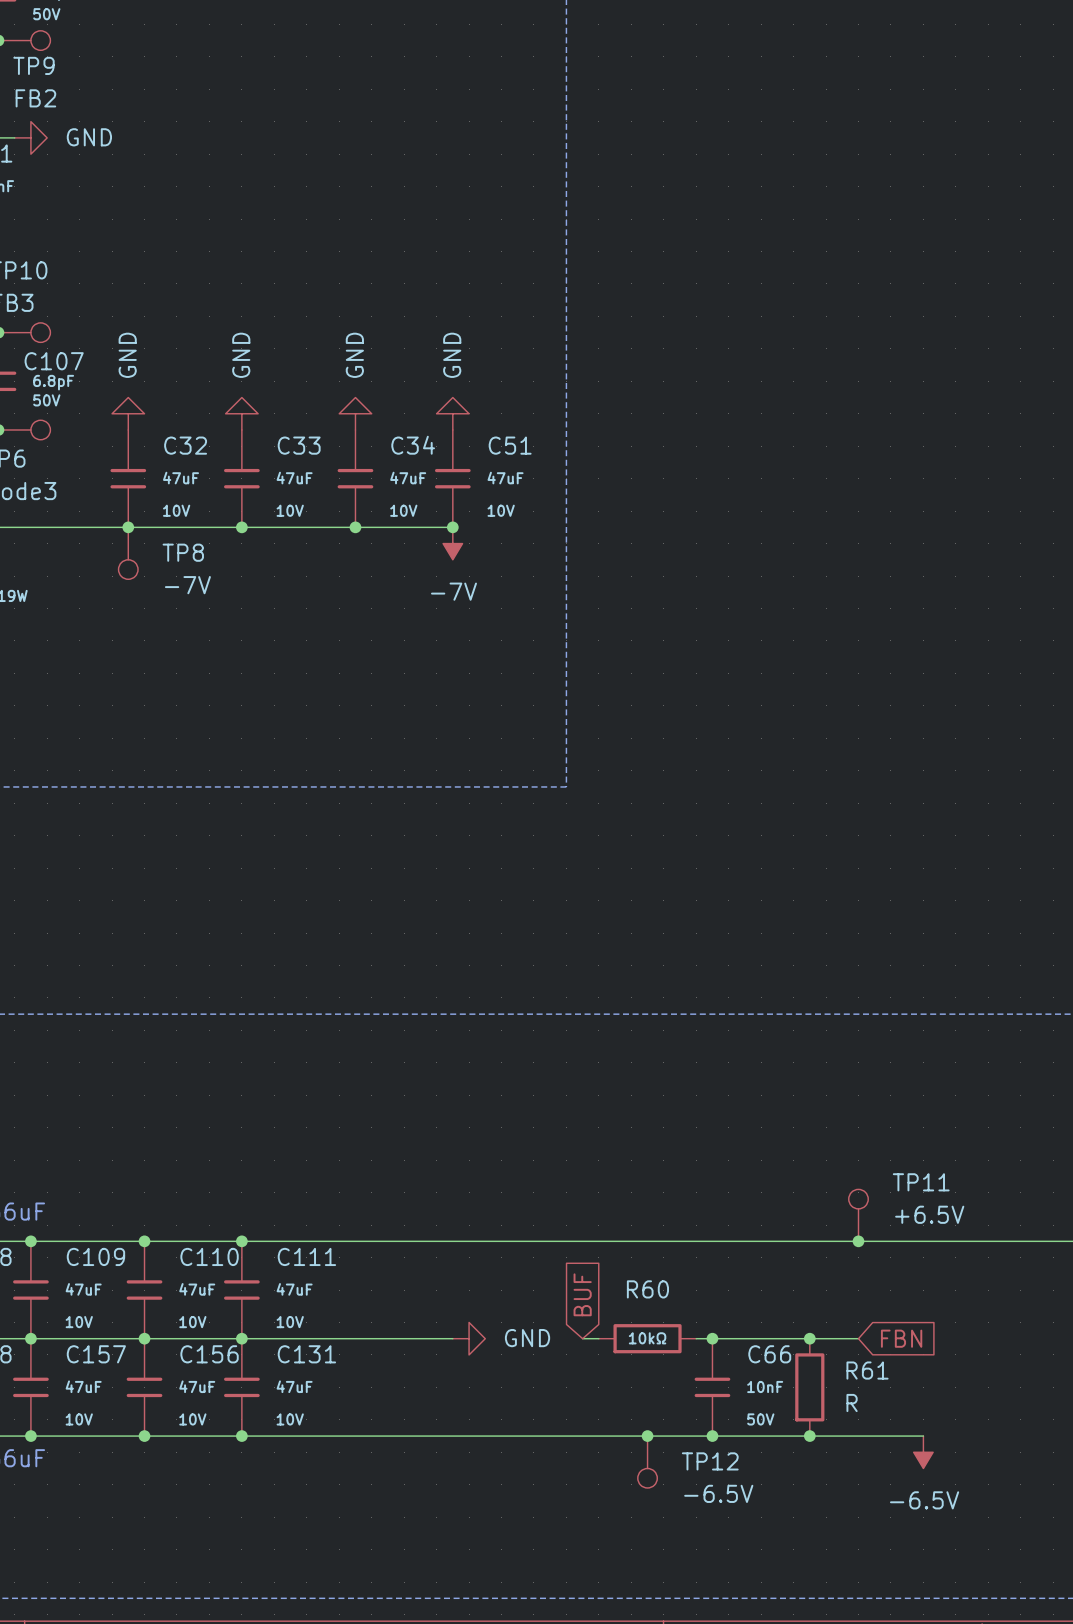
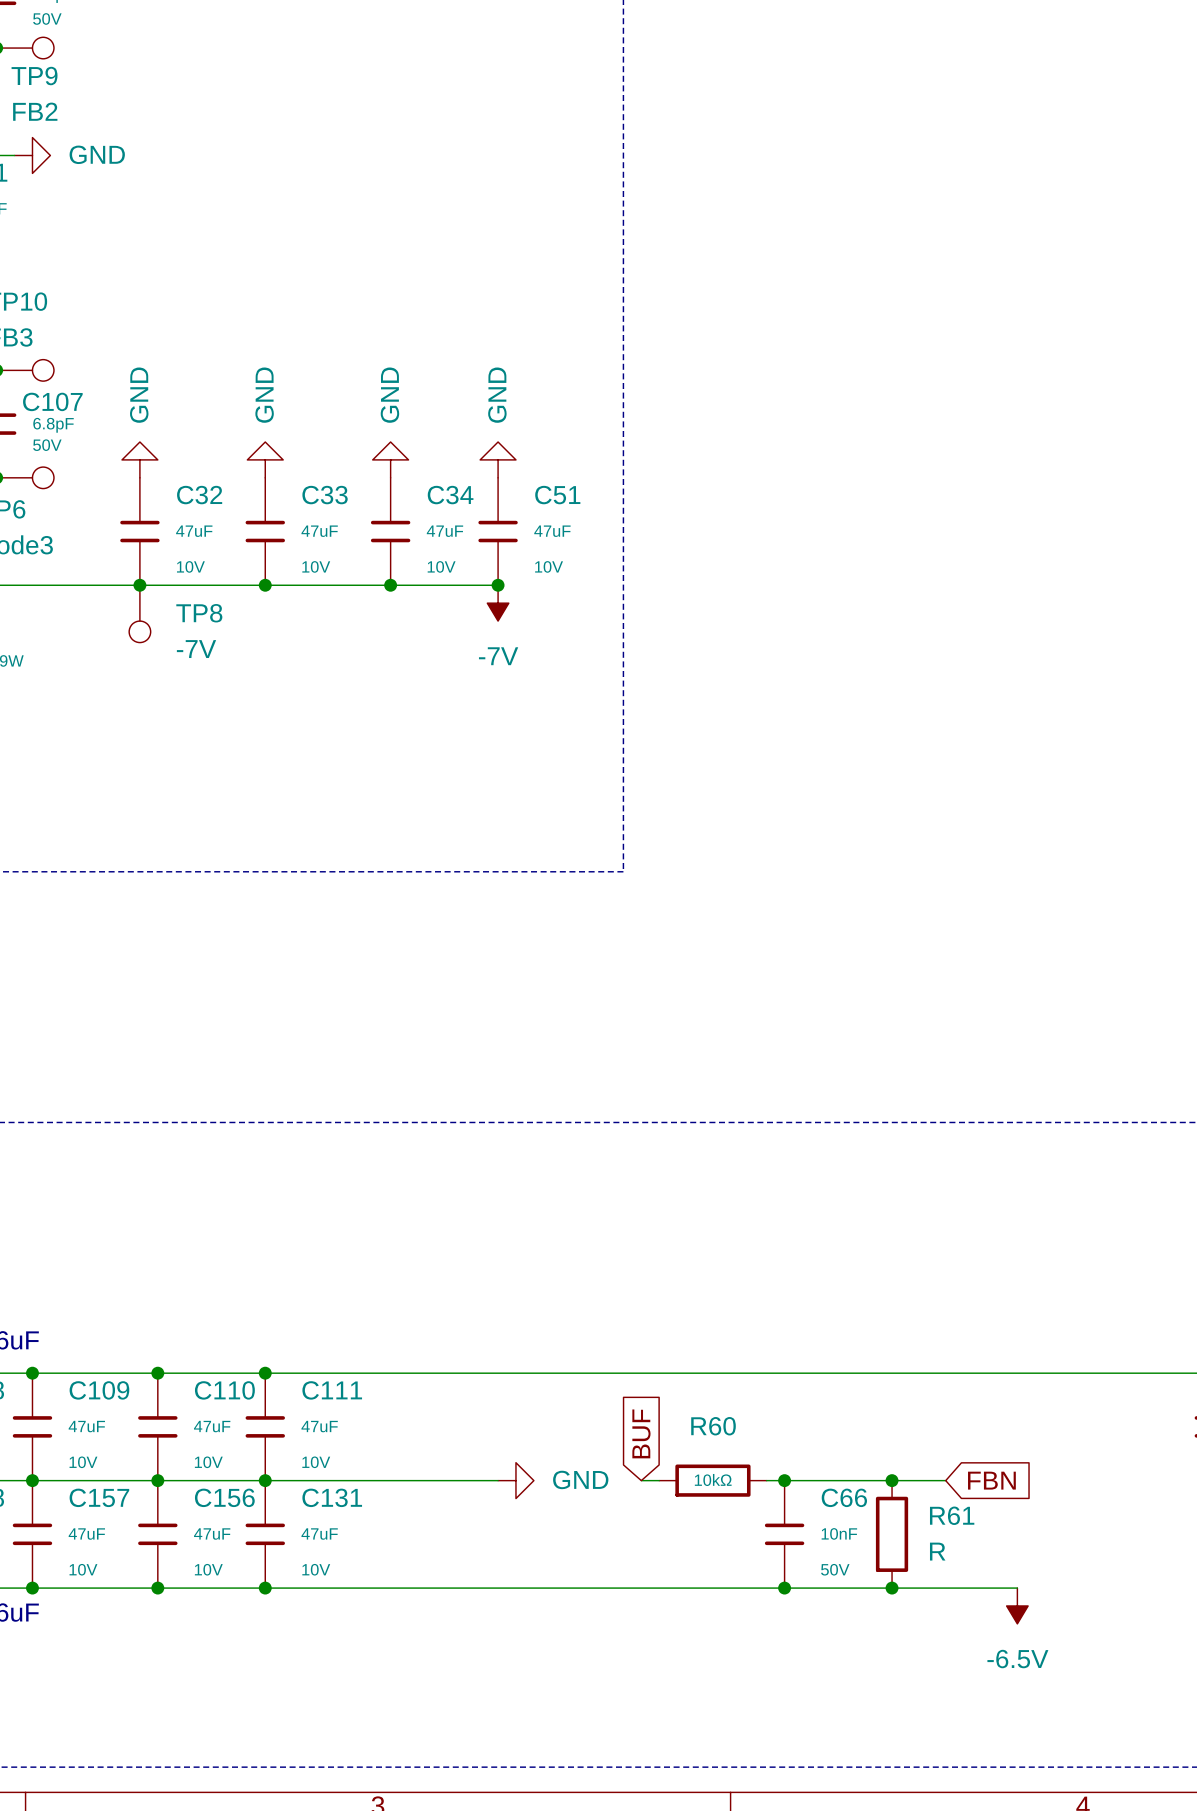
TP11: +6.5V (858, 1215) -> none
junction: (858, 1241) -> none
junction: (647, 1436) -> none
TP12: -6.5V (647, 1462) -> none

